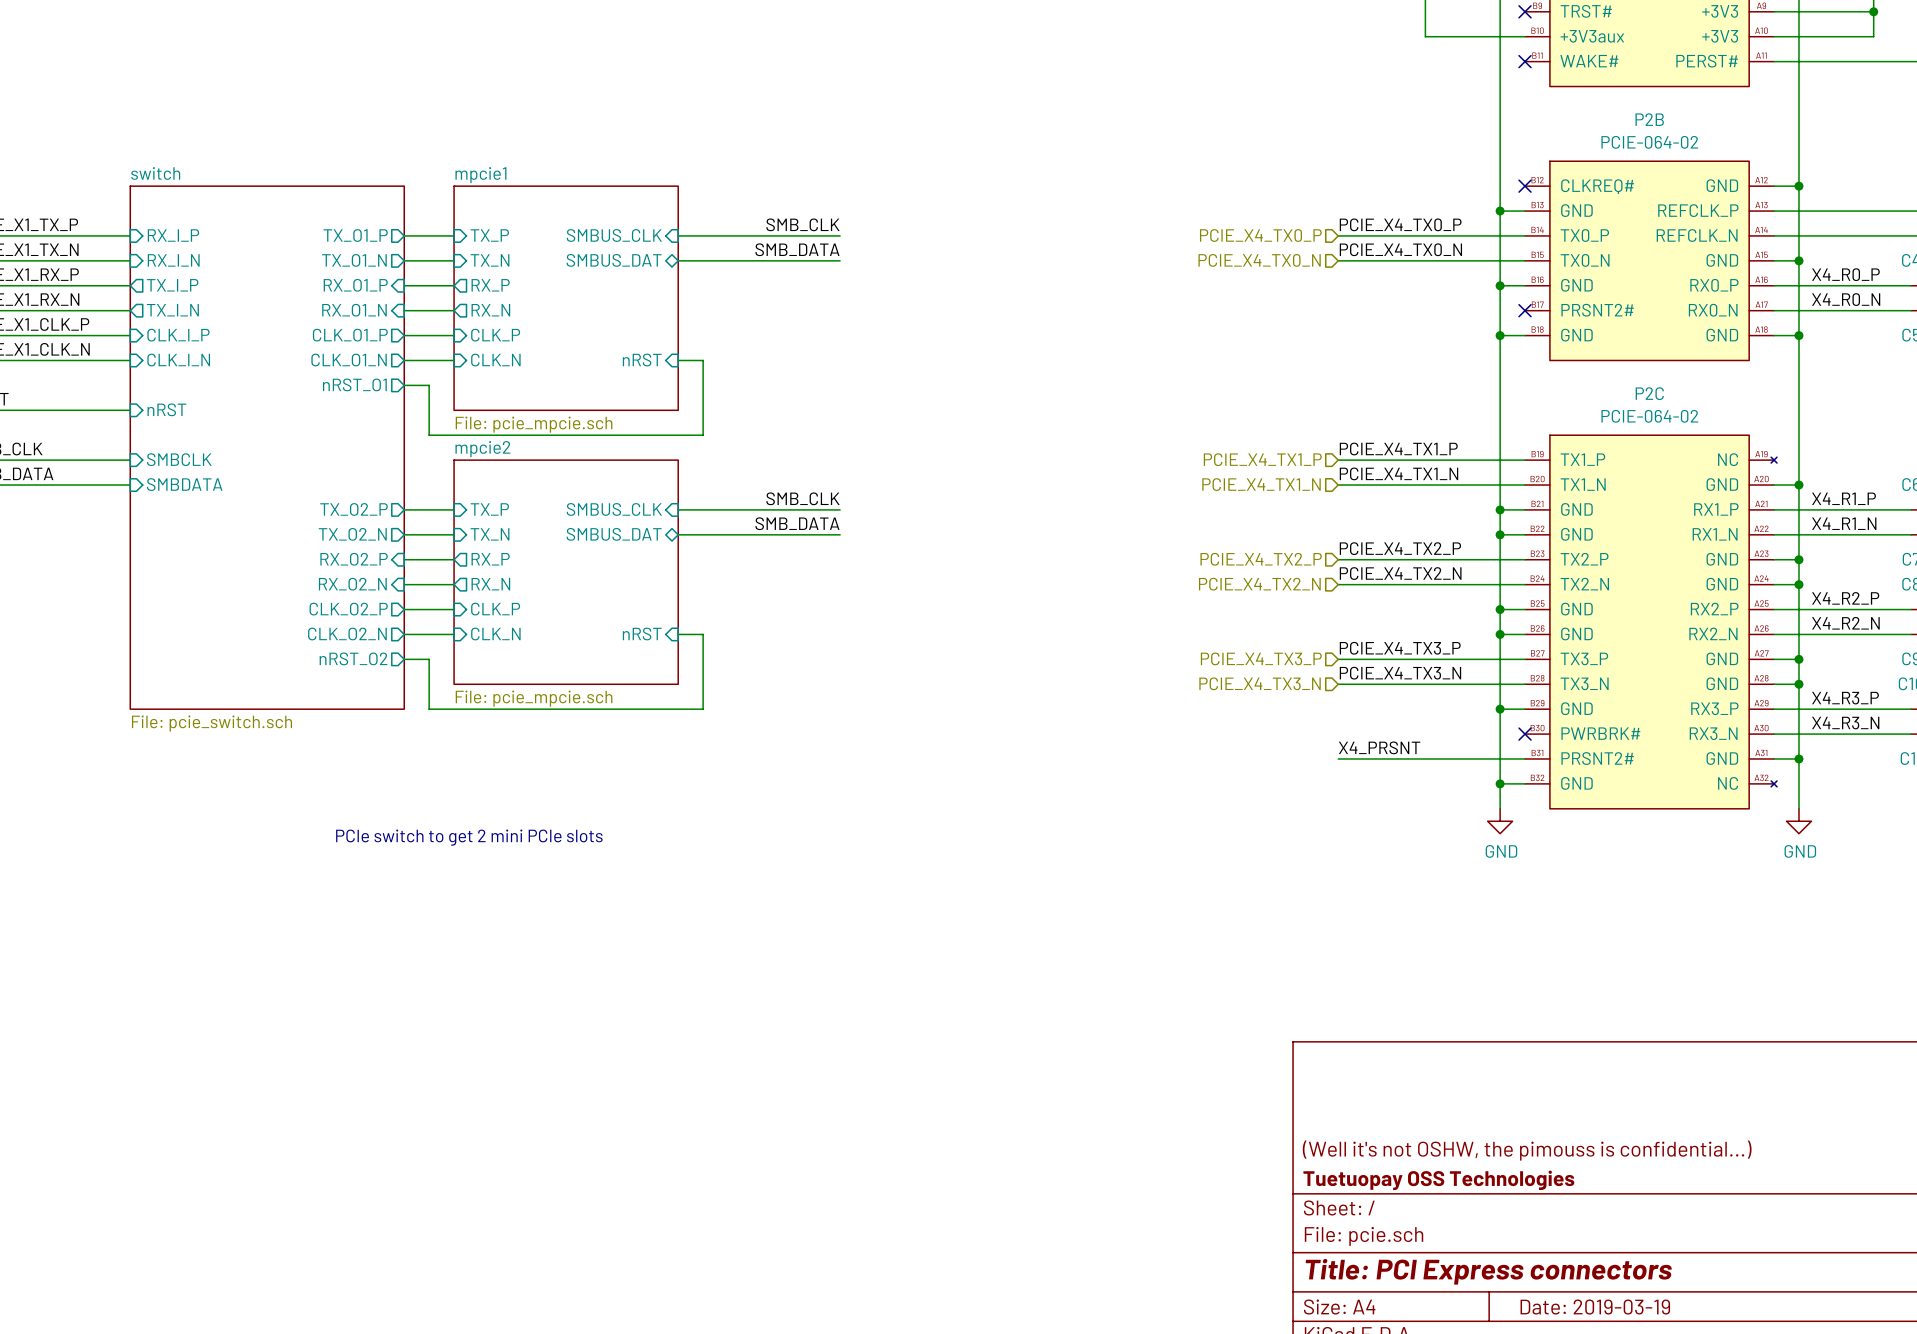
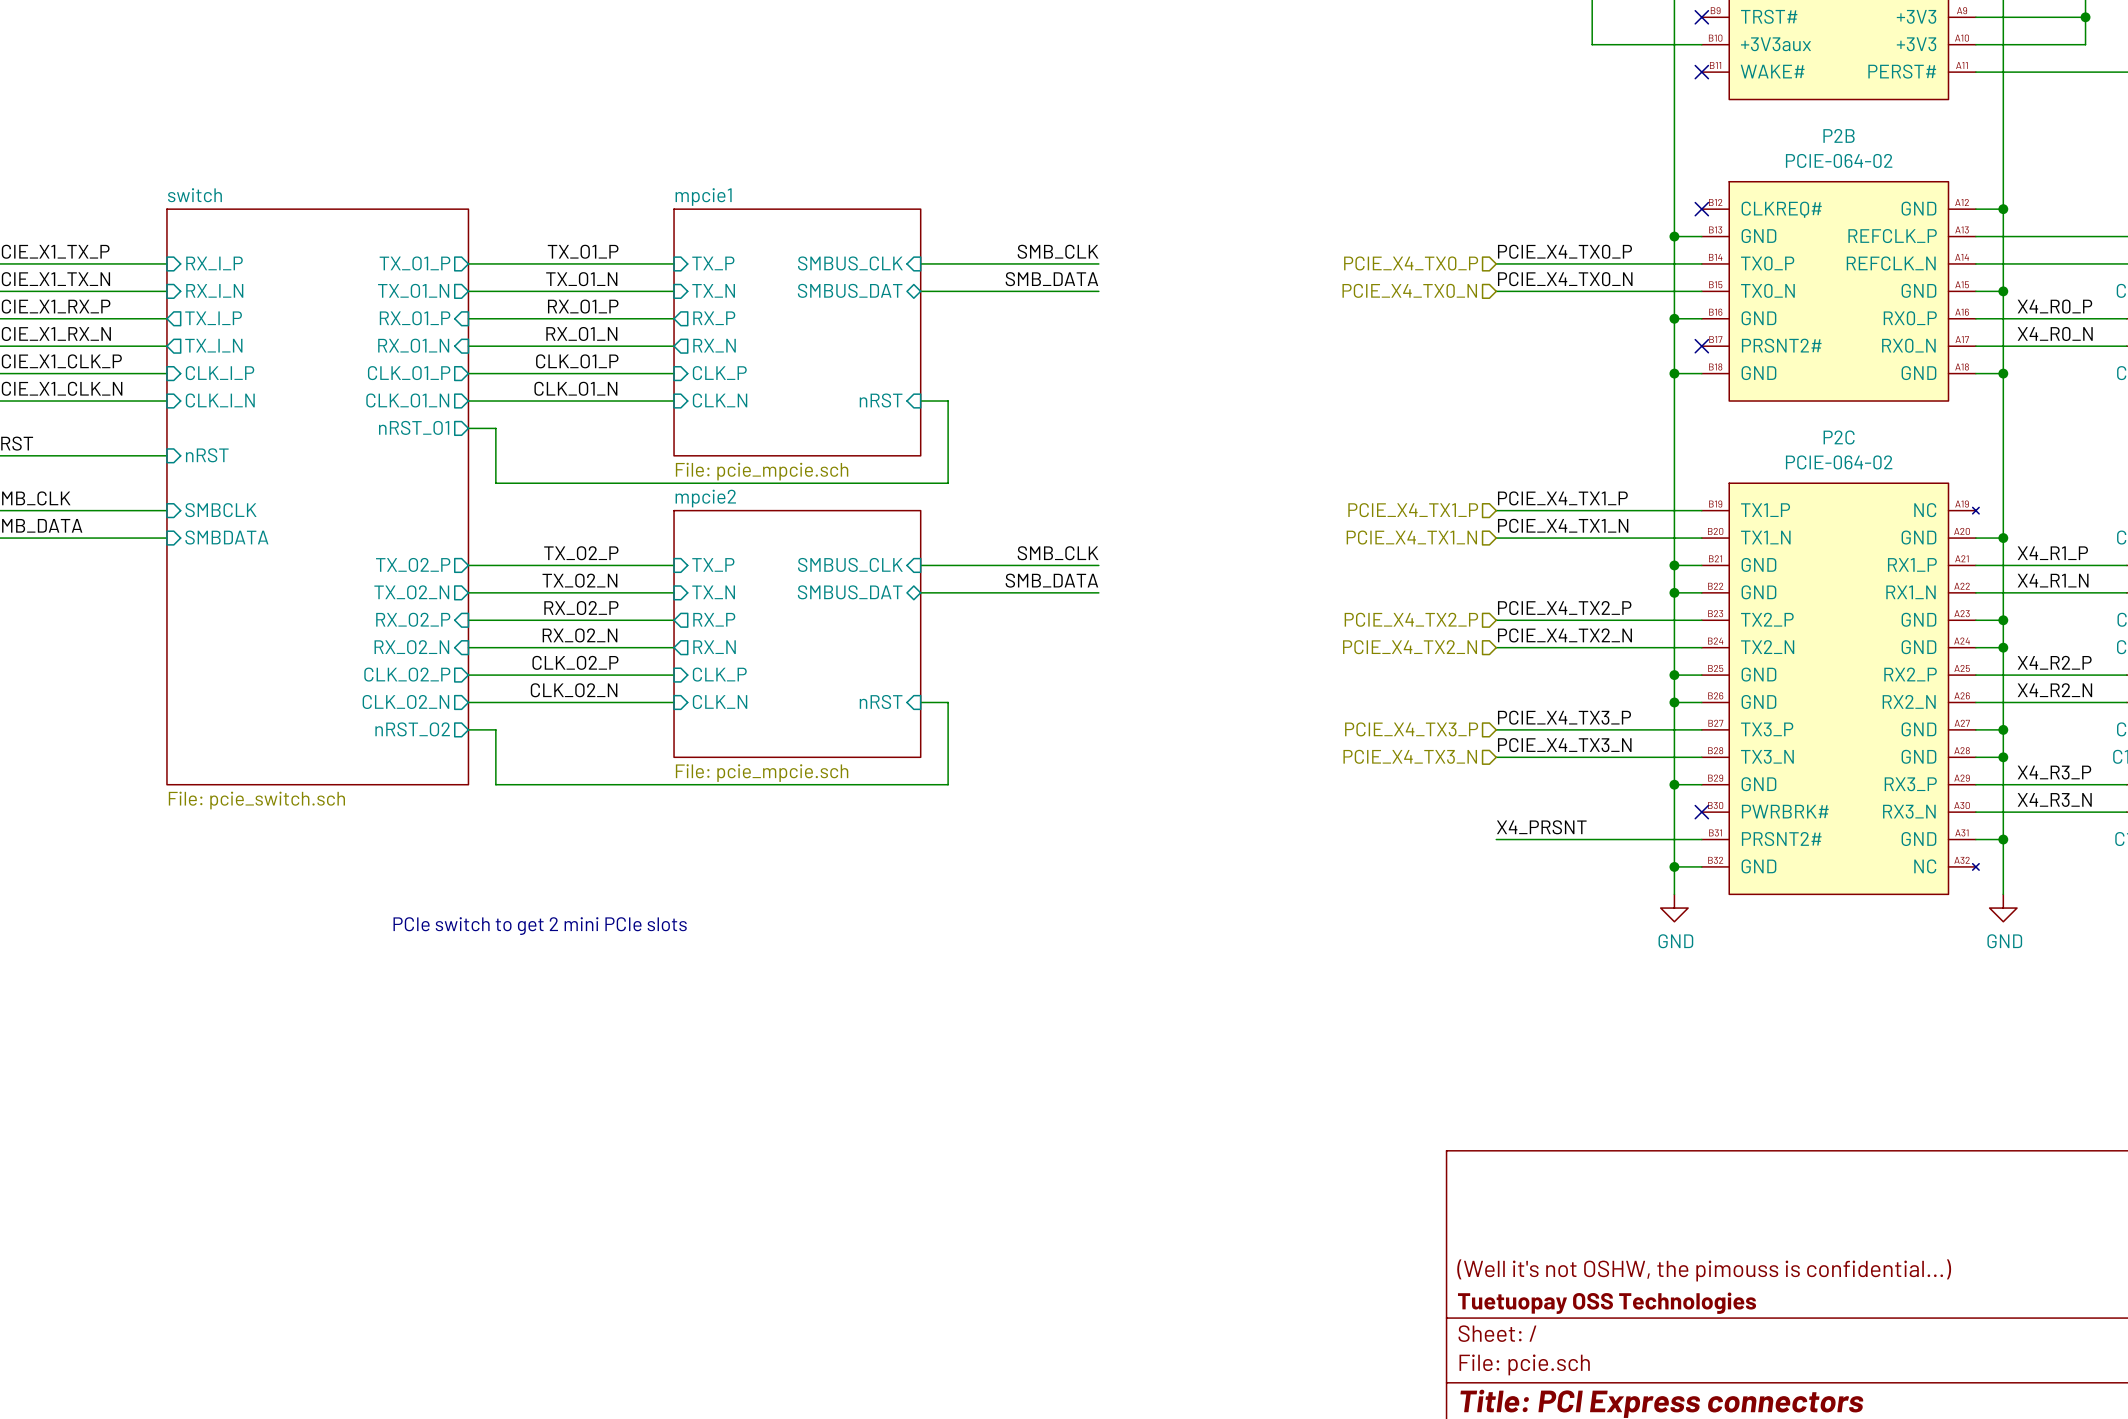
label: none -> TX_O1_P (583, 251)
label position: SMB_CLK (803, 224) -> SMB_CLK (1058, 251)
wire: none -> (523, 263) (674, 263)
sheet pin position: TX_P (489, 235) -> TX_P (713, 263)
sheet pin position: SMBUS_CLK (614, 235) -> SMBUS_CLK (850, 263)
wire: (678, 235) (815, 235) -> (948, 263) (1098, 263)
label: none -> TX_O1_N (581, 279)
label position: SMB_DATA (797, 249) -> SMB_DATA (1051, 279)
wire: none -> (523, 291) (674, 291)
sheet pin position: TX_N (490, 260) -> TX_N (713, 290)
sheet pin position: SMBUS_DAT (614, 260) -> SMBUS_DAT (850, 290)
wire: (678, 260) (815, 260) -> (948, 291) (1098, 291)
label: none -> RX_O1_P (583, 306)
wire: none -> (523, 318) (674, 318)
sheet pin position: RX_P (490, 285) -> RX_P (714, 318)
sheet mpcie1 position: (566, 298) -> (797, 332)
label: none -> RX_O1_N (581, 333)
wire: none -> (523, 346) (674, 346)
sheet pin position: RX_N (490, 310) -> RX_N (714, 345)
label: none -> CLK_O1_P (577, 361)
wire: none -> (523, 373) (674, 373)
sheet pin position: CLK_P (495, 335) -> CLK_P (719, 373)
label: none -> CLK_O1_N (575, 388)
wire: none -> (523, 401) (674, 401)
sheet pin position: CLK_N (495, 360) -> CLK_N (720, 400)
sheet pin position: nRST (642, 360) -> nRST (881, 400)
wire: (678, 360) (703, 360) (703, 435) -> (920, 401) (948, 401) (948, 483) (797, 483)
label: none -> TX_O2_P (581, 553)
label position: SMB_CLK (803, 498) -> SMB_CLK (1058, 553)
wire: none -> (523, 565) (674, 565)
sheet pin position: TX_P (489, 509) -> TX_P (713, 564)
sheet pin position: SMBUS_CLK (614, 509) -> SMBUS_CLK (850, 564)
wire: (678, 509) (815, 509) -> (948, 565) (1098, 565)
label: none -> TX_O2_N (579, 580)
label position: SMB_DATA (797, 523) -> SMB_DATA (1051, 580)
wire: none -> (523, 592) (674, 592)
sheet pin position: TX_N (490, 534) -> TX_N (713, 592)
sheet pin position: SMBUS_DAT (614, 534) -> SMBUS_DAT (850, 592)
wire: (678, 534) (815, 534) -> (948, 592) (1098, 592)
label: none -> RX_O2_P (581, 608)
wire: none -> (523, 620) (674, 620)
sheet pin position: RX_P (490, 559) -> RX_P (714, 619)
sheet mpcie2 position: (566, 572) -> (797, 633)
label: none -> RX_O2_N (580, 635)
wire: none -> (523, 647) (674, 647)
sheet pin position: RX_N (490, 584) -> RX_N (714, 647)
label: none -> CLK_O2_P (575, 662)
wire: none -> (523, 675) (674, 675)
sheet pin position: CLK_P (495, 609) -> CLK_P (719, 674)
label: none -> CLK_O2_N (574, 690)
sheet pin position: nRST (642, 633) -> nRST (881, 701)
wire: none -> (523, 702) (674, 702)
sheet pin position: CLK_N (495, 634) -> CLK_N (720, 701)
wire: (678, 634) (703, 634) (703, 709) -> (920, 702) (948, 702) (948, 784) (797, 784)

